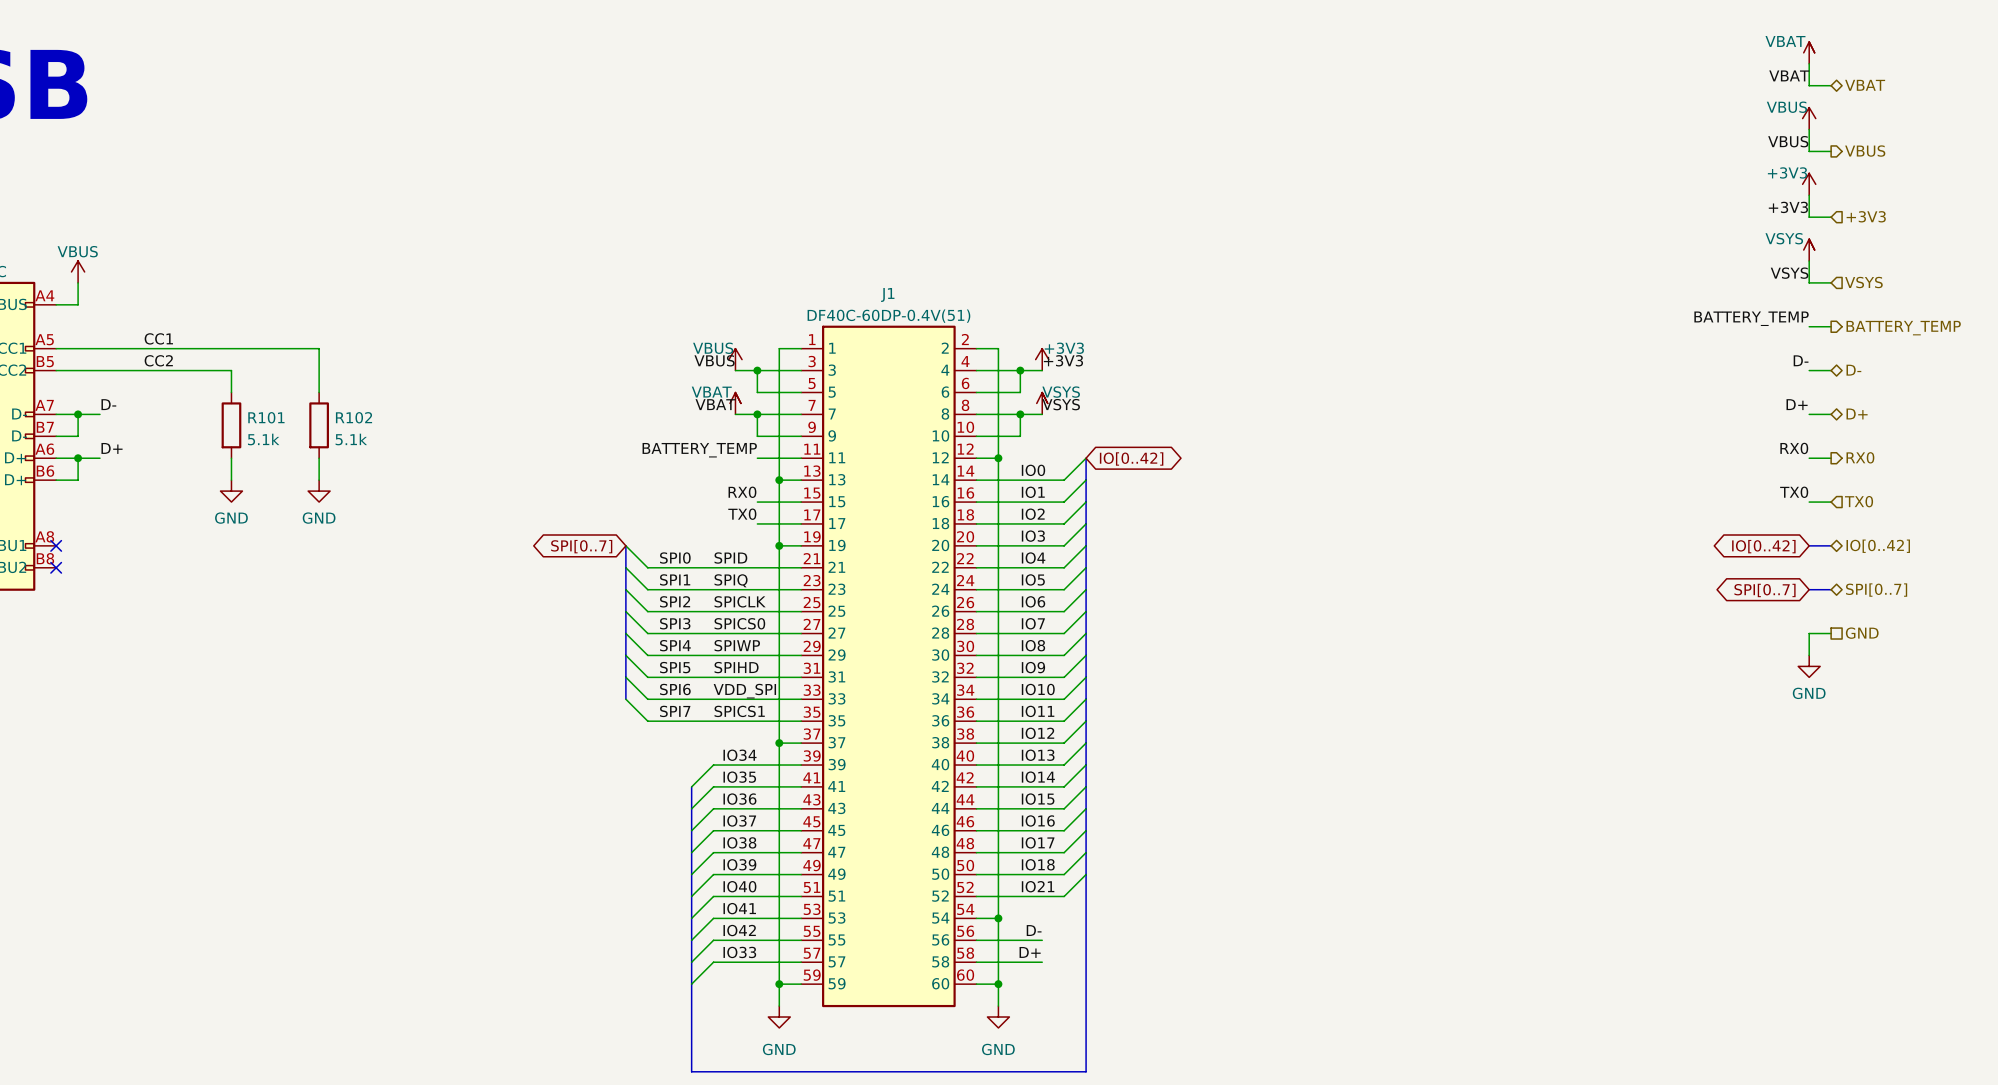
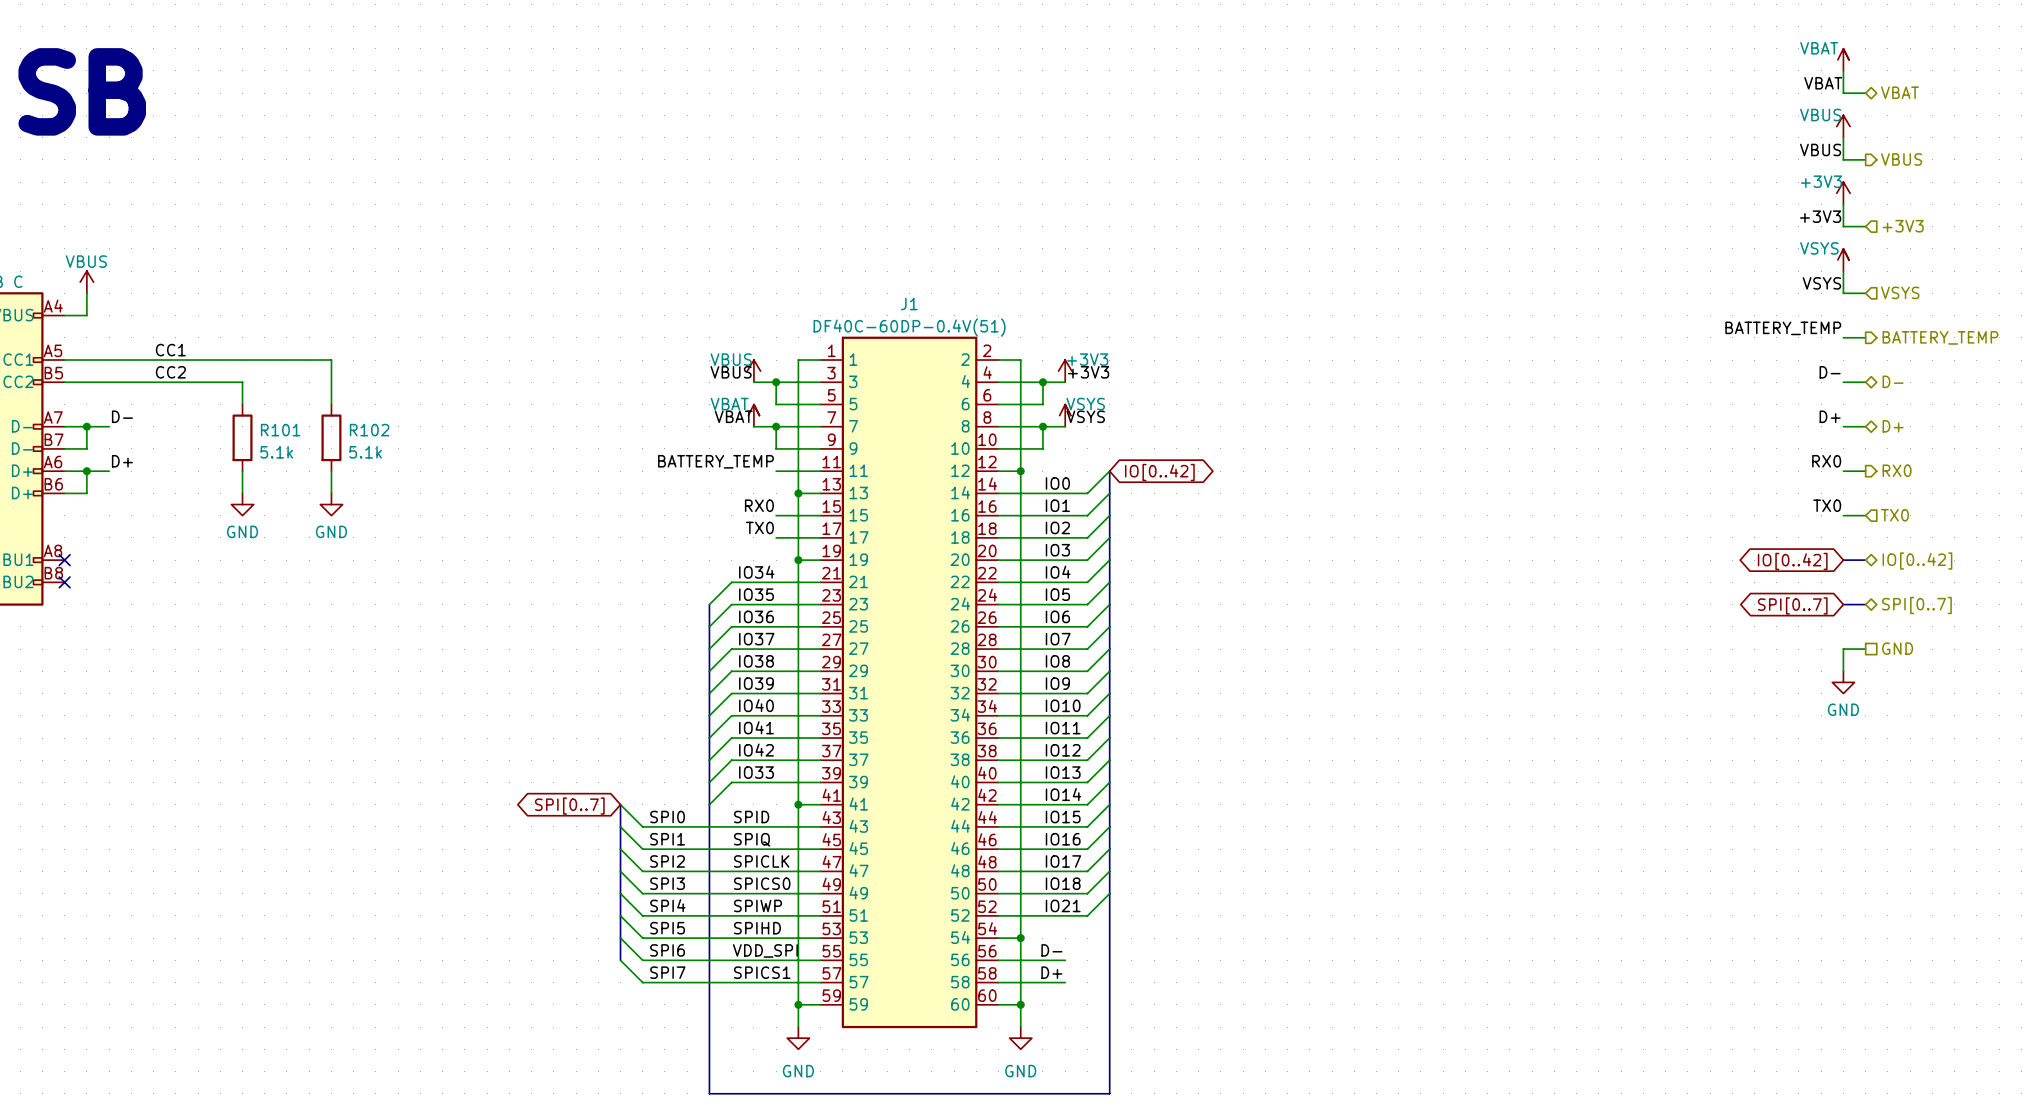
wire: (625, 545) (647, 567) (713, 567) -> (709, 604) (731, 582)
bus: (625, 545) (625, 699) -> none
global label: SPI[0..7] (581, 546) -> none
label: SPI0 (675, 558) -> none
label: SPID (730, 558) -> none
label: none -> IO34 (756, 572)
wire: (625, 567) (647, 589) (713, 589) -> (709, 626) (731, 604)
label: SPI1 (675, 579) -> none
label: SPIQ (731, 580) -> none
wire: (625, 589) (647, 611) (713, 611) -> (709, 649) (731, 626)
bus: none -> (709, 604) (709, 804)
label: SPI2 (675, 601) -> none
label: SPICLK (740, 601) -> none
wire: (625, 611) (647, 633) (713, 633) -> (709, 671) (731, 649)
label: SPI3 (675, 623) -> none
label: SPICS0 (739, 623) -> none
wire: (625, 633) (647, 655) (713, 655) -> (709, 693) (731, 671)
label: SPI4 (675, 645) -> none
label: SPIWP (737, 645) -> none
wire: (625, 655) (647, 677) (713, 677) -> (709, 715) (731, 693)
label: SPI5 (675, 667) -> none
label: SPIHD (736, 667) -> none
wire: (625, 677) (647, 699) (713, 699) -> (709, 738) (731, 715)
label: SPI6 (675, 689) -> none
label: VDD_SPI (744, 691) -> none
wire: (625, 699) (647, 721) (713, 721) -> (709, 760) (731, 738)
label: SPI7 (675, 711) -> none
label: SPICS1 (739, 711) -> none
junction position: (779, 743) -> (798, 804)
label: IO34 (740, 755) -> IO33 (756, 772)
label position: IO35 (739, 777) -> IO35 (756, 594)
bus: none -> (620, 804) (620, 960)
wire: (779, 786) (713, 786) (691, 808) -> (798, 760) (731, 760) (709, 782)
global label: none -> SPI[0..7] (569, 806)
label: none -> SPI0 (667, 817)
label: none -> SPID (751, 817)
label position: IO36 (739, 799) -> IO36 (756, 616)
wire: (713, 808) (691, 830) -> (731, 826) (642, 826) (620, 804)
label: none -> SPI1 (667, 839)
label position: IO37 (739, 820) -> IO37 (756, 639)
label: none -> SPIQ (752, 839)
wire: (713, 830) (691, 852) -> (731, 849) (642, 849) (620, 826)
label: none -> SPI2 (667, 861)
label position: IO38 (739, 842) -> IO38 (756, 661)
label: none -> SPICLK (761, 861)
wire: (713, 852) (691, 874) -> (731, 871) (642, 871) (620, 849)
label: none -> SPI3 (667, 883)
label position: IO39 (739, 864) -> IO39 (756, 683)
label: none -> SPICS0 (762, 883)
wire: (713, 874) (691, 896) -> (731, 893) (642, 893) (620, 871)
label: none -> SPI4 (667, 905)
label: none -> SPIWP (757, 905)
label position: IO40 (739, 886) -> IO40 (756, 705)
wire: (713, 896) (691, 918) -> (731, 915) (642, 915) (620, 893)
label: none -> SPI5 (667, 928)
label: none -> SPIHD (757, 928)
label position: IO41 (739, 908) -> IO41 (756, 727)
wire: (713, 918) (691, 940) -> (731, 938) (642, 938) (620, 915)
label: none -> SPI6 (667, 950)
label position: IO42 (739, 930) -> IO42 (756, 750)
label: none -> VDD_SPI (765, 950)
wire: (713, 940) (691, 962) -> (731, 960) (642, 960) (620, 938)
label: none -> SPI7 (667, 972)
label: IO33 (739, 952) -> none
label: none -> SPICS1 (762, 972)
wire: (713, 962) (691, 984) -> (731, 982) (642, 982) (620, 960)

